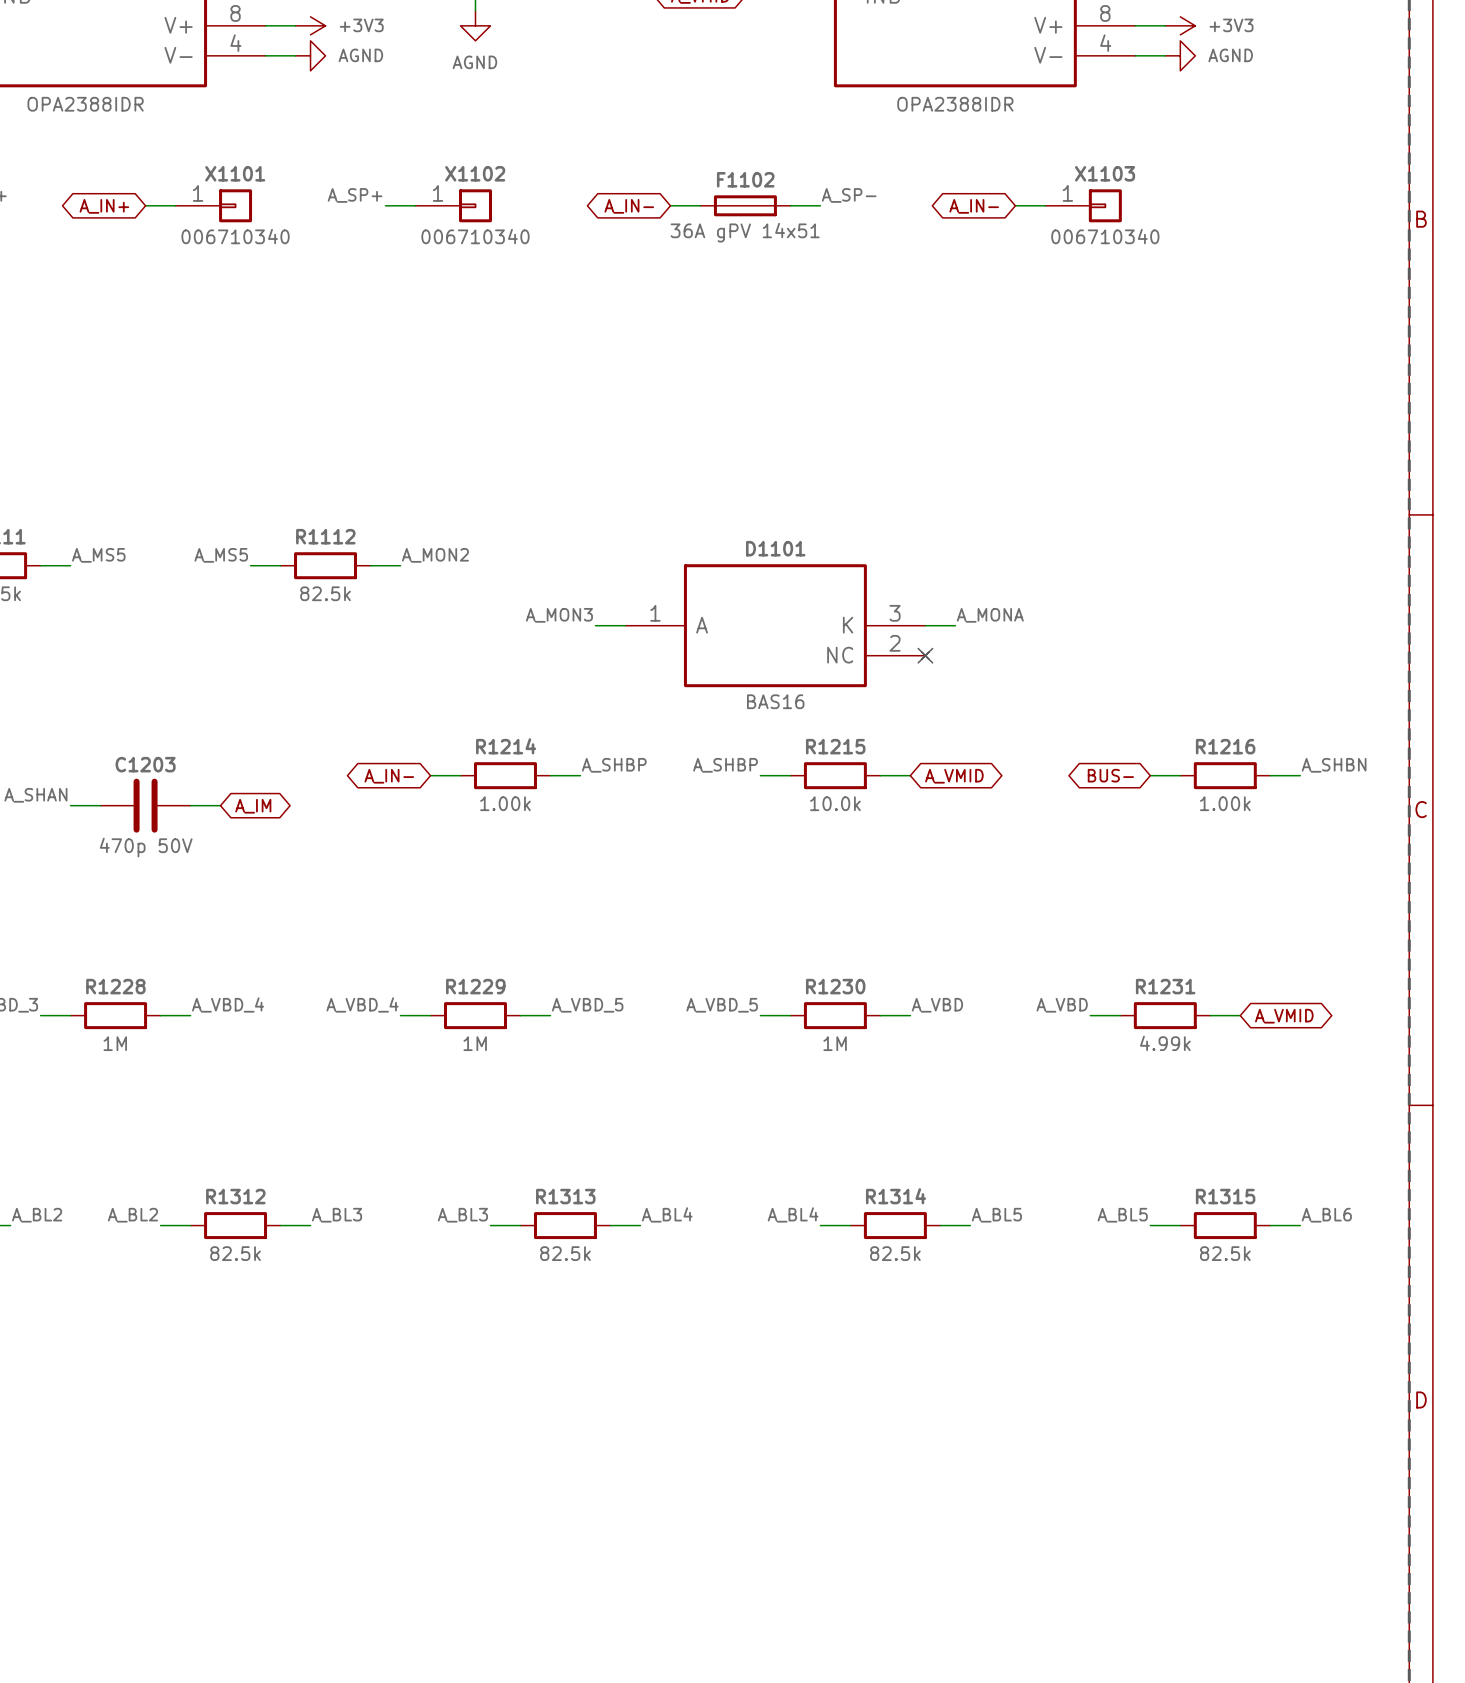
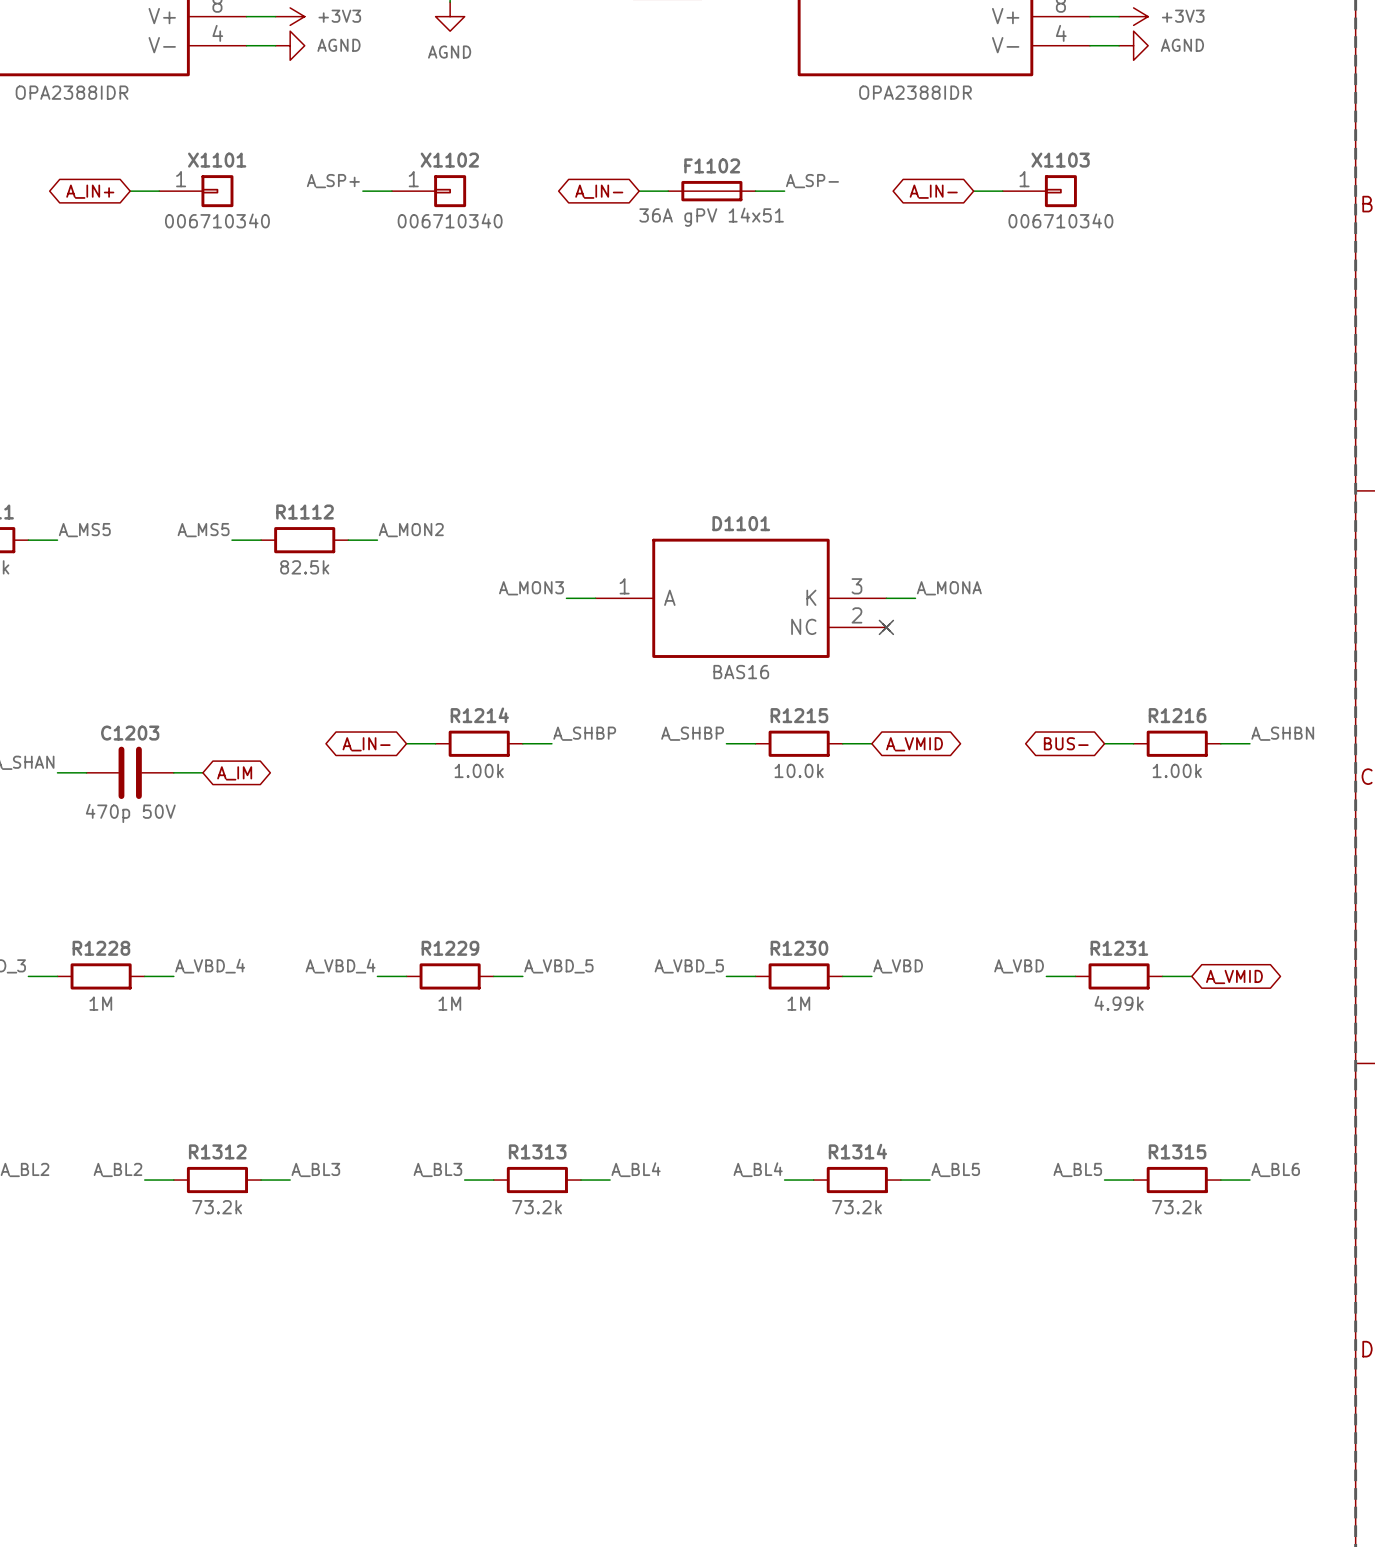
R1312 value: 82.5k (235, 1253) -> 73.2k (217, 1207)
R1313 value: 82.5k (565, 1253) -> 73.2k (537, 1207)
R1314 value: 82.5k (895, 1253) -> 73.2k (857, 1207)
R1315 value: 82.5k (1225, 1253) -> 73.2k (1176, 1207)

